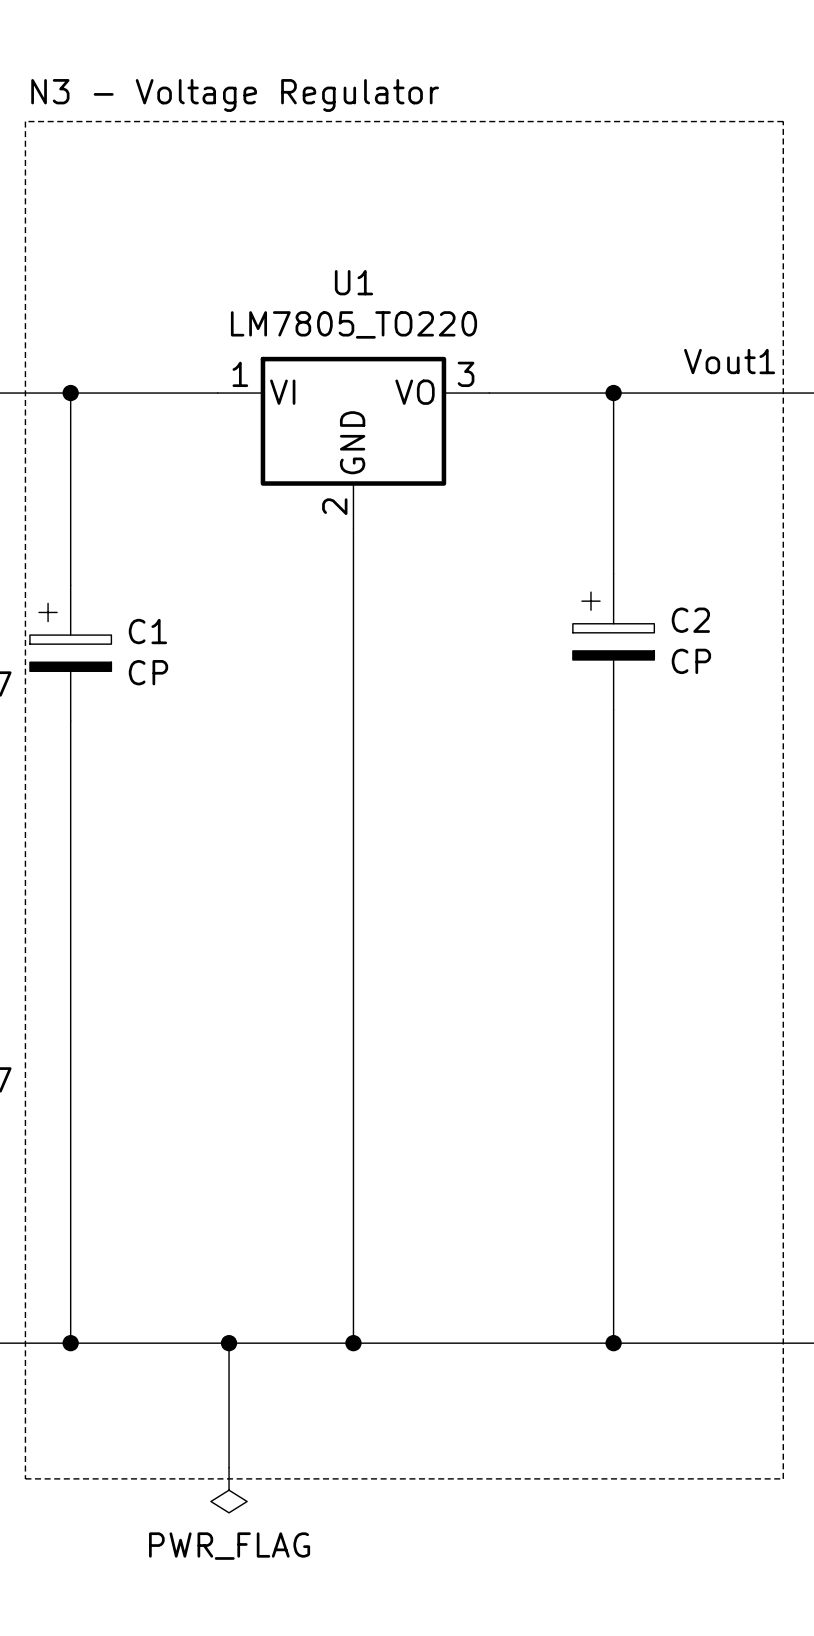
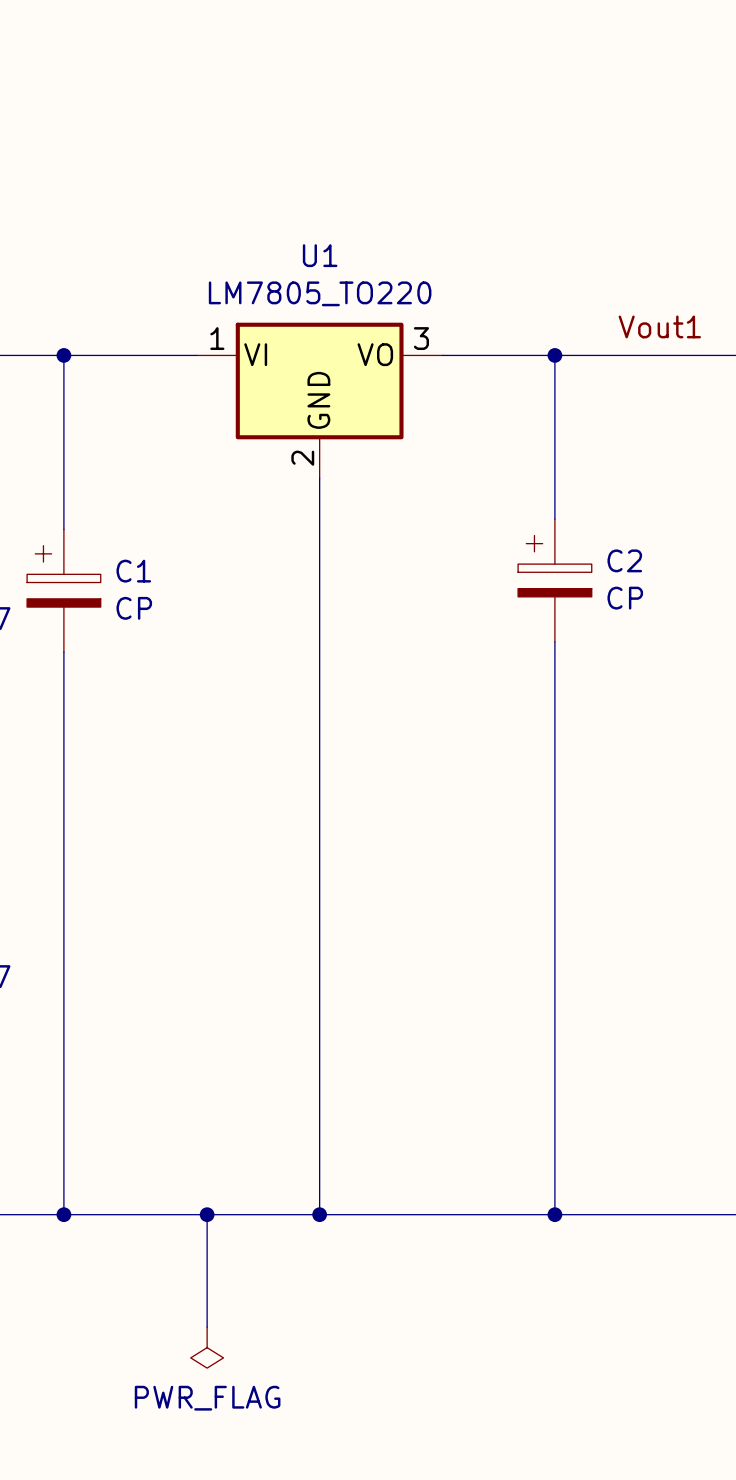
text: N3 - Voltage Regulator (235, 95) -> none
line: (25, 121) (783, 121) (783, 1478) (25, 1478) (25, 121) -> none

